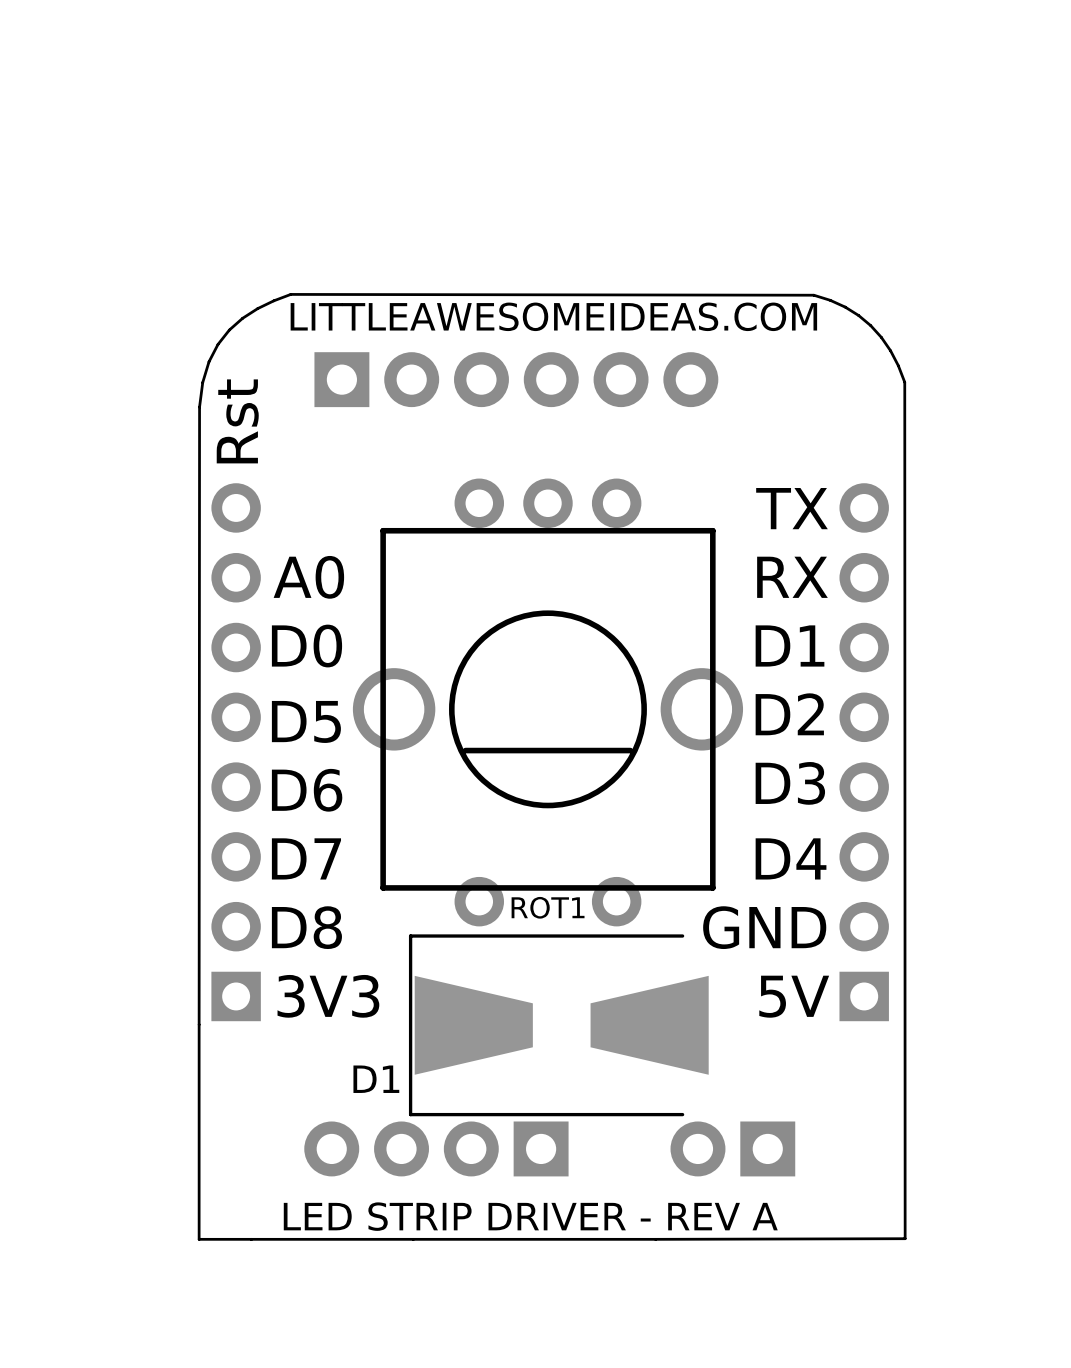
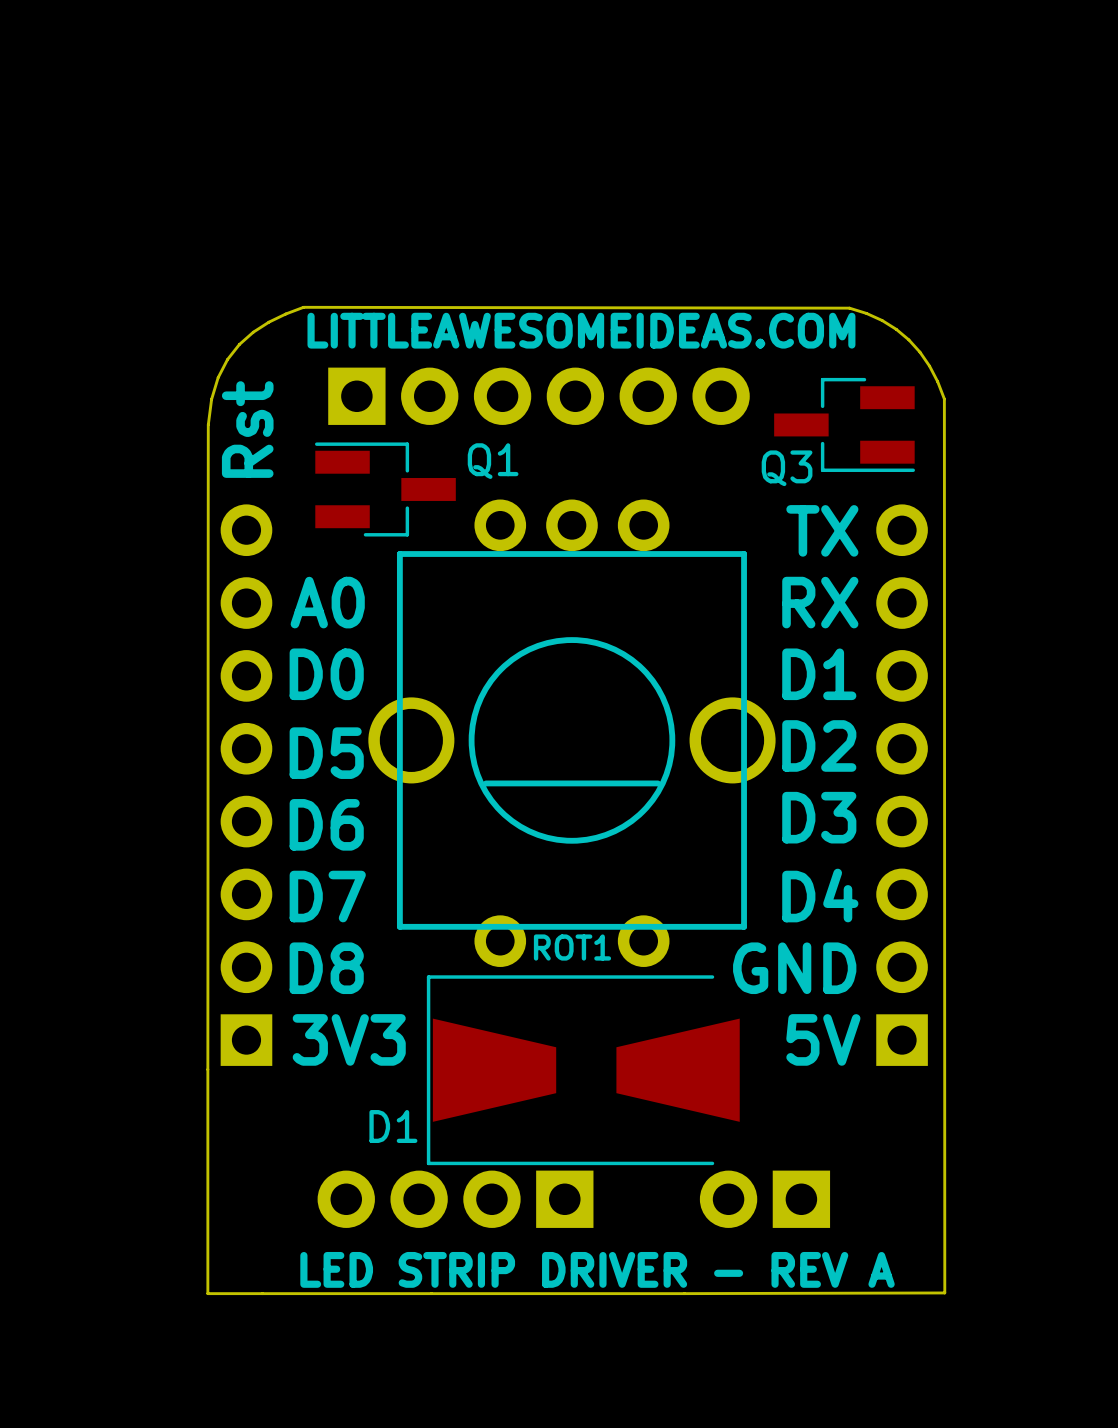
Q3: none -> (844, 424)
Q1: none -> (385, 489)

